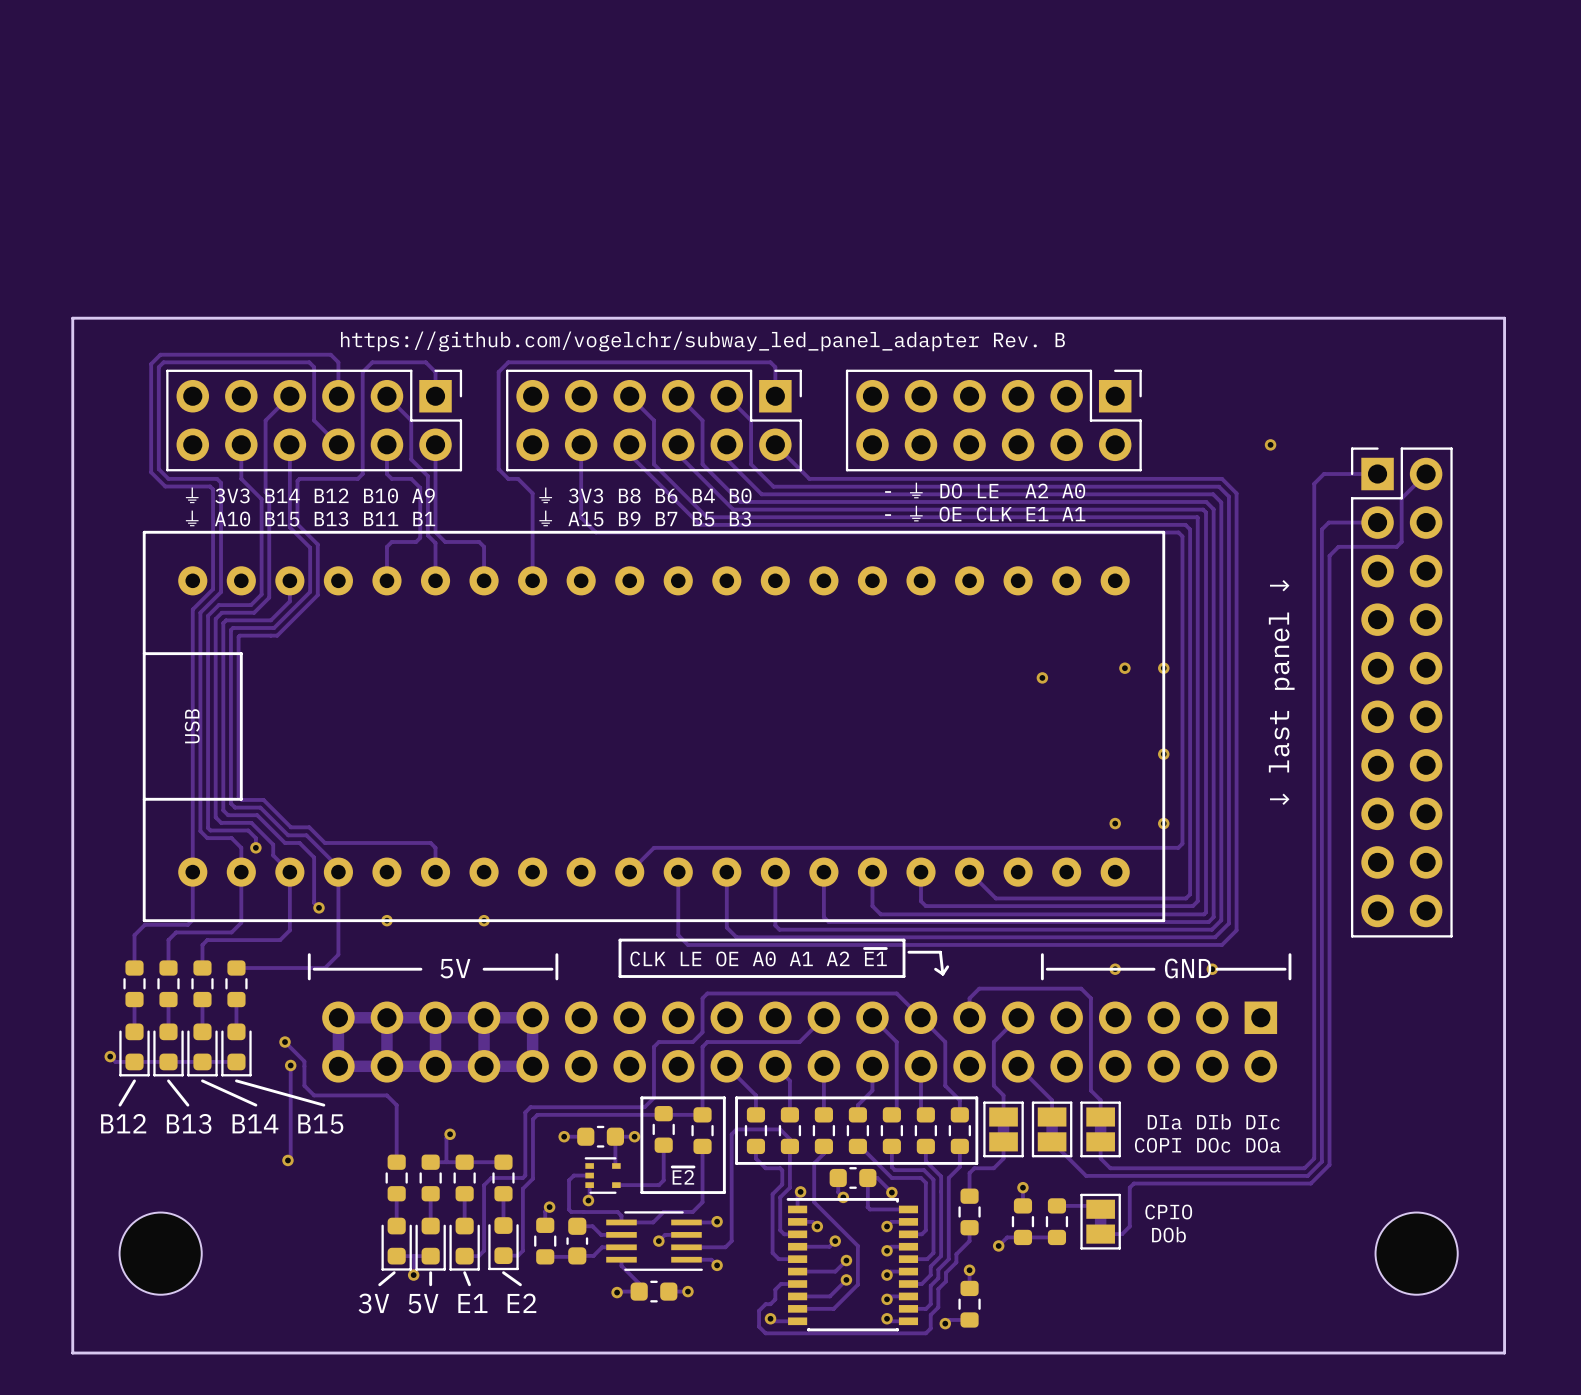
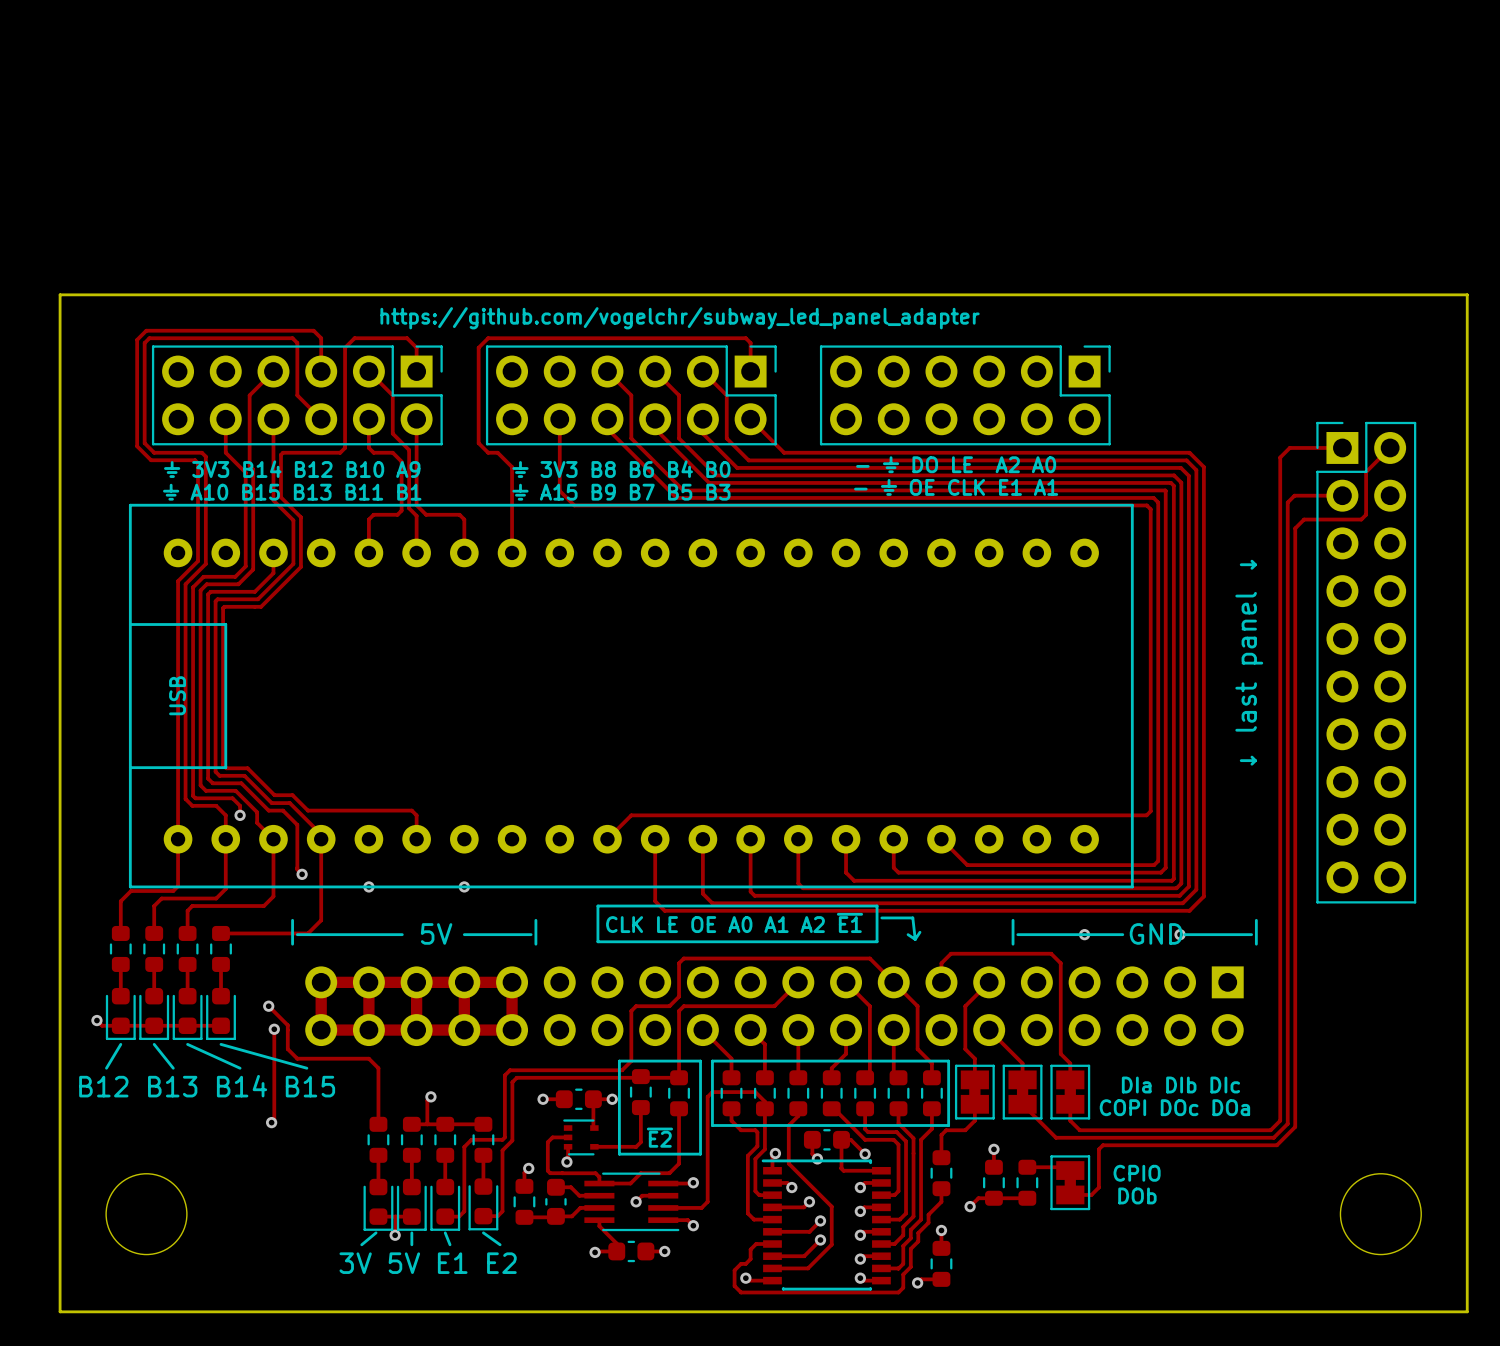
text: https://github.com/vogelchr/subway_led_panel_adapter Rev. B (702, 341) -> https://github.com/vogelchr/subway_led_panel_adapter (680, 318)
via: (1270, 444) -> none
via: (1124, 668) -> none
via: (1163, 668) -> none
via: (1042, 677) -> none
via: (1163, 754) -> none
via: (1115, 823) -> none
via: (1163, 823) -> none

